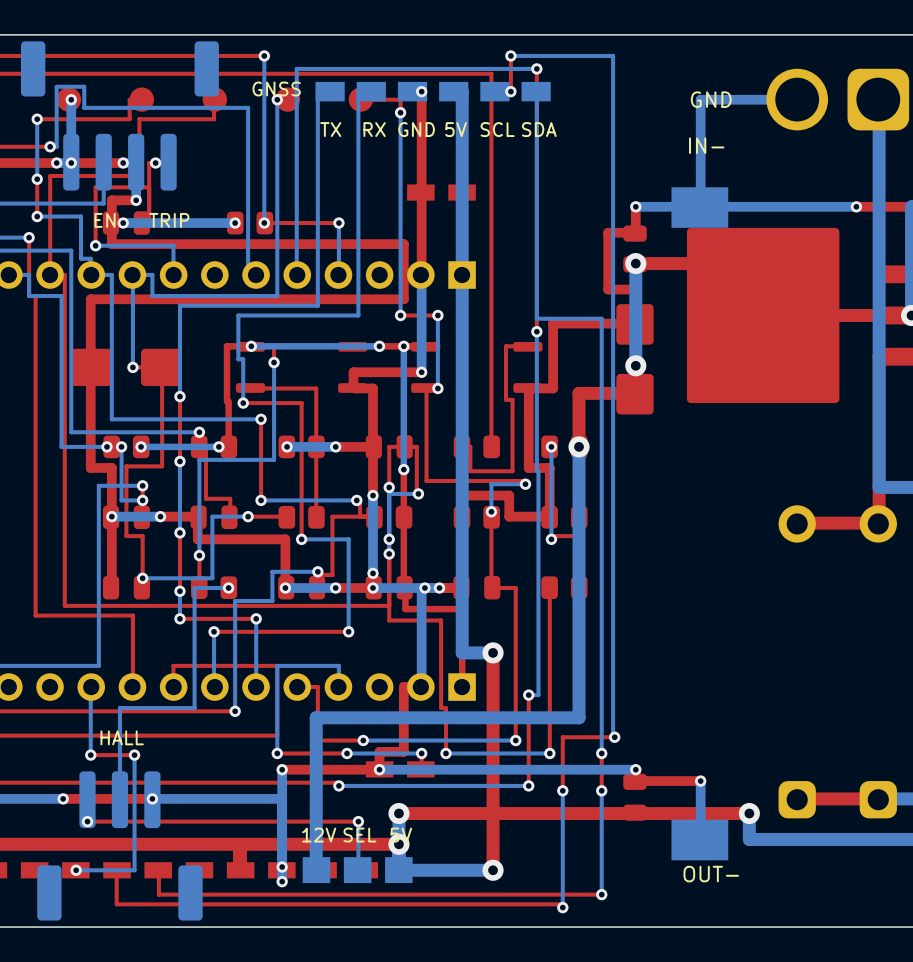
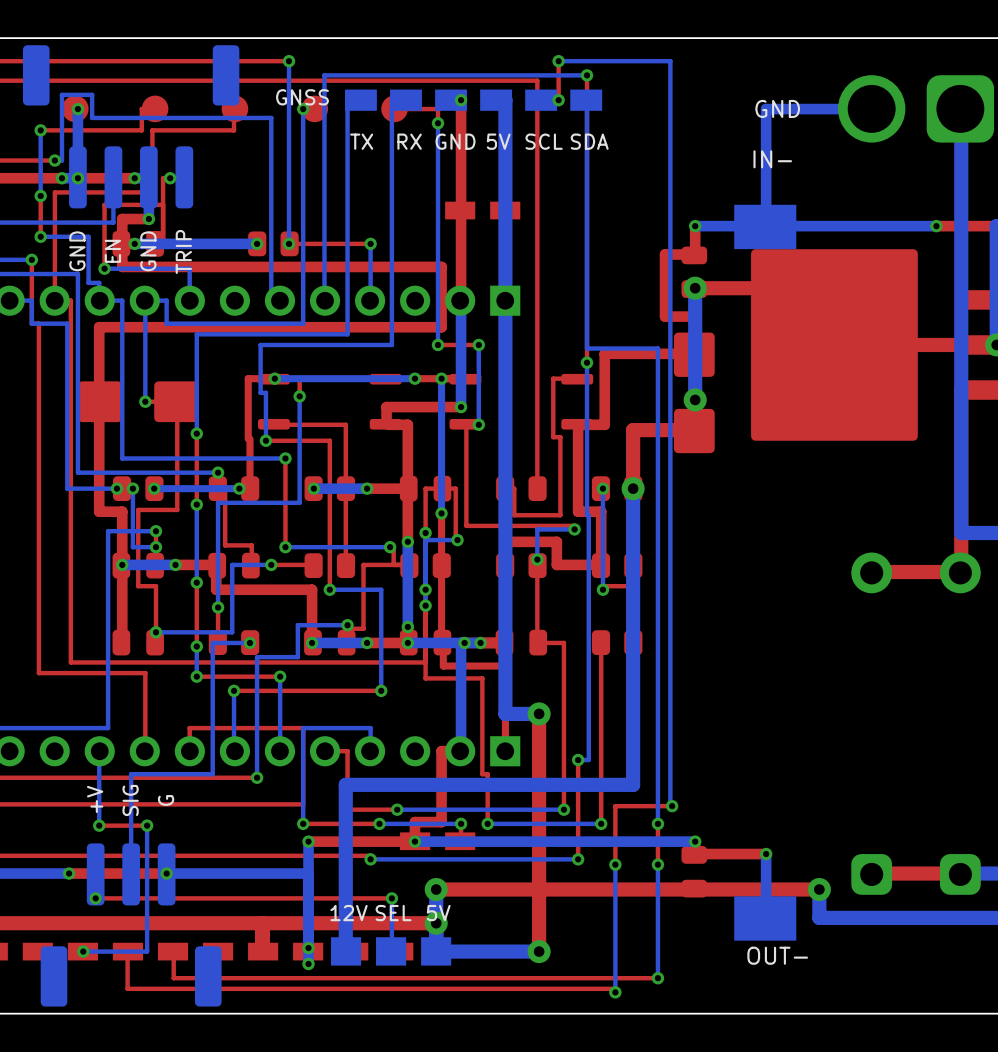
text rotation: 0° (105, 220) -> 90° counterclockwise (112, 251)
text rotation: 0° (169, 220) -> 90° counterclockwise (183, 252)
text: none -> GND (77, 251)
text: none -> GND (148, 251)
text: none -> SIG (130, 800)
text: none -> G (166, 800)
text: HALL (122, 737) -> +V (95, 799)

